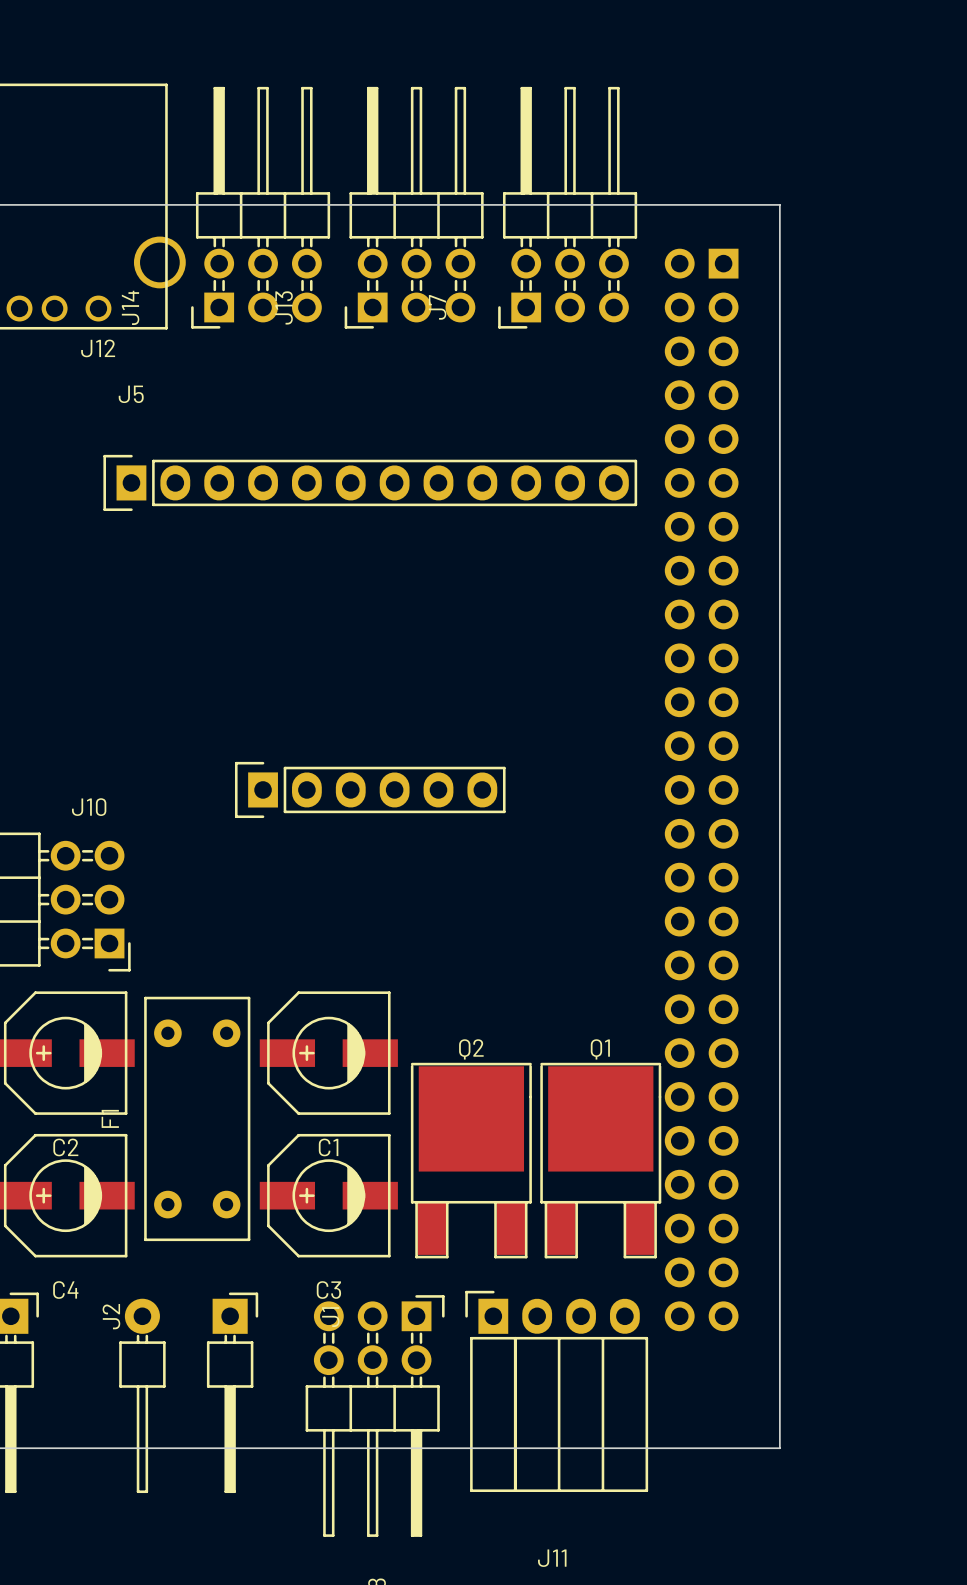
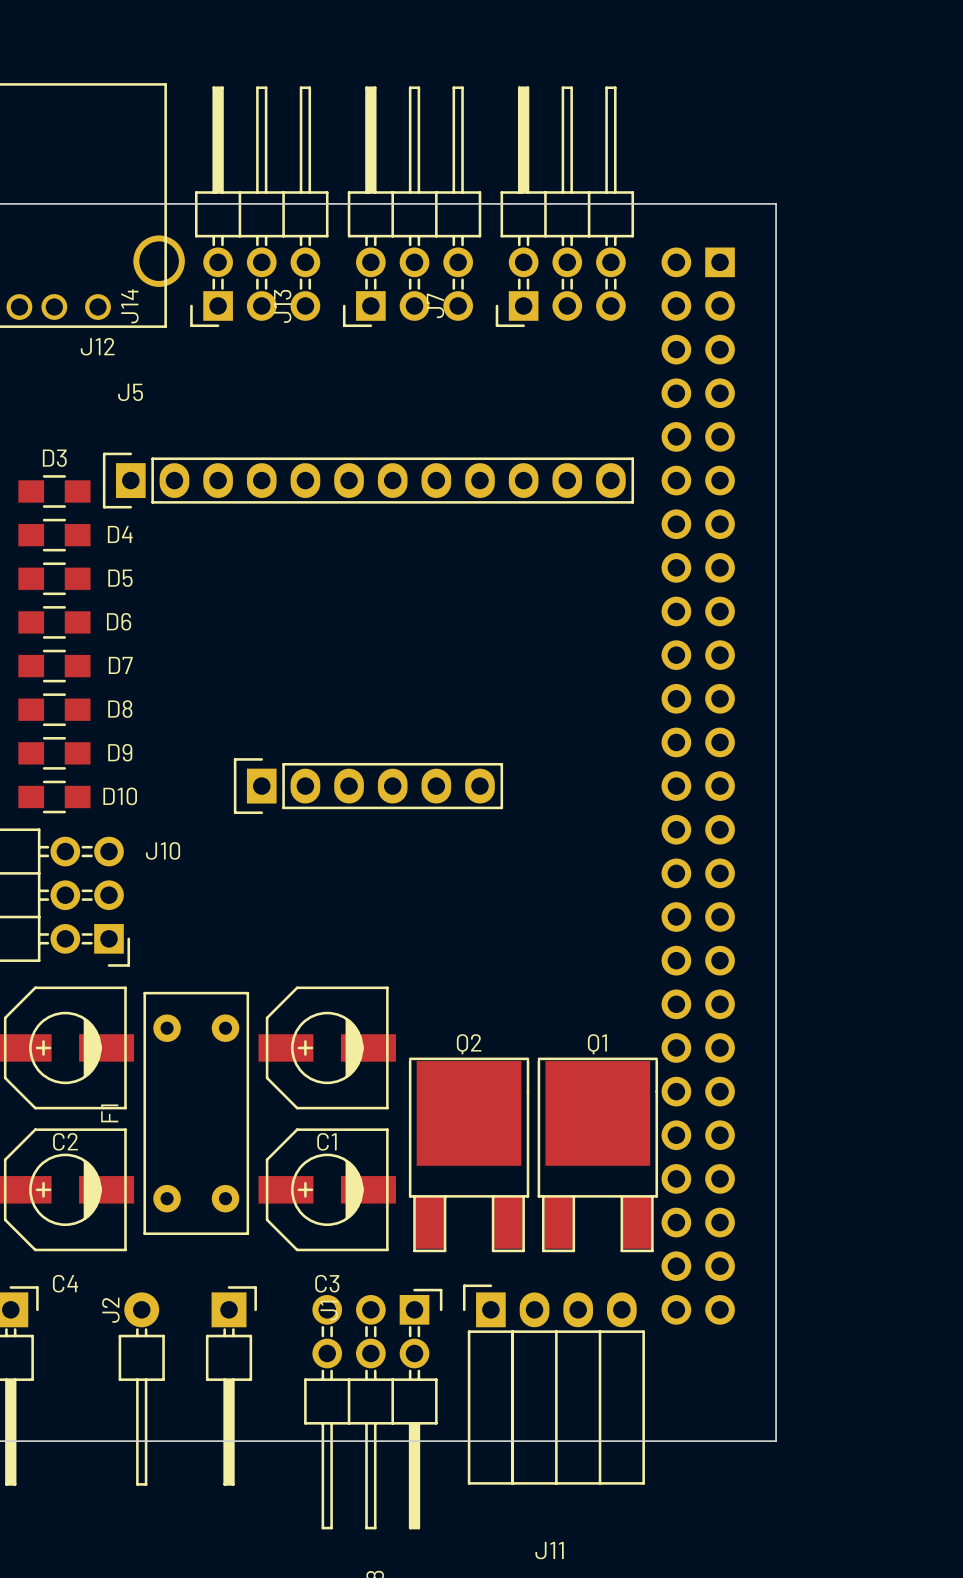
D3: none -> (54, 491)
D4: none -> (54, 535)
D5: none -> (54, 578)
D6: none -> (54, 622)
D7: none -> (54, 666)
D8: none -> (54, 709)
D9: none -> (54, 753)
D10: none -> (54, 797)
J10 name position: J10 (89, 807) -> J10 (163, 850)

